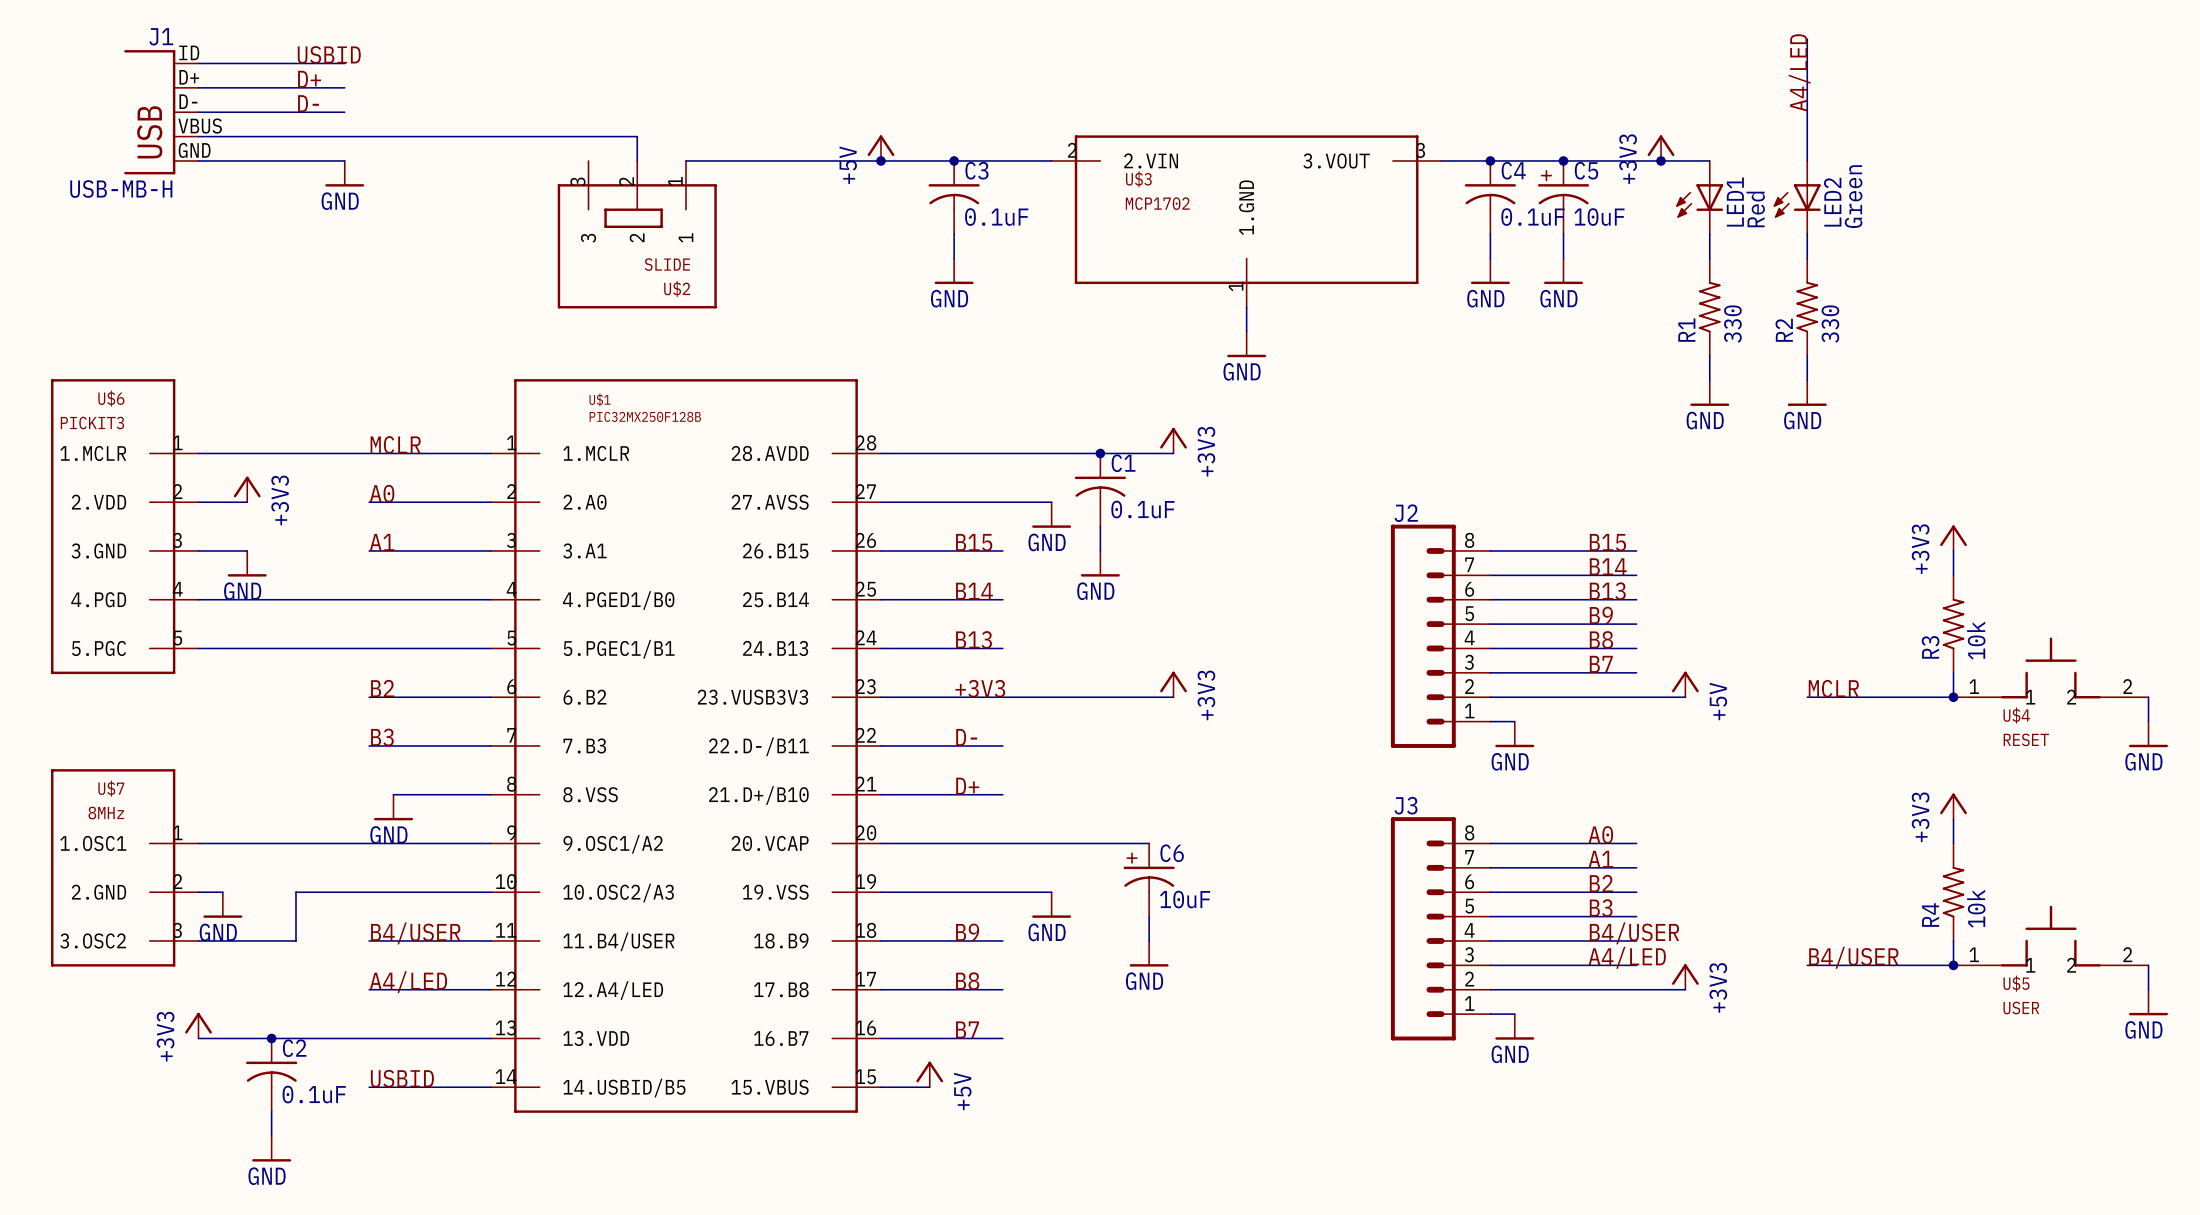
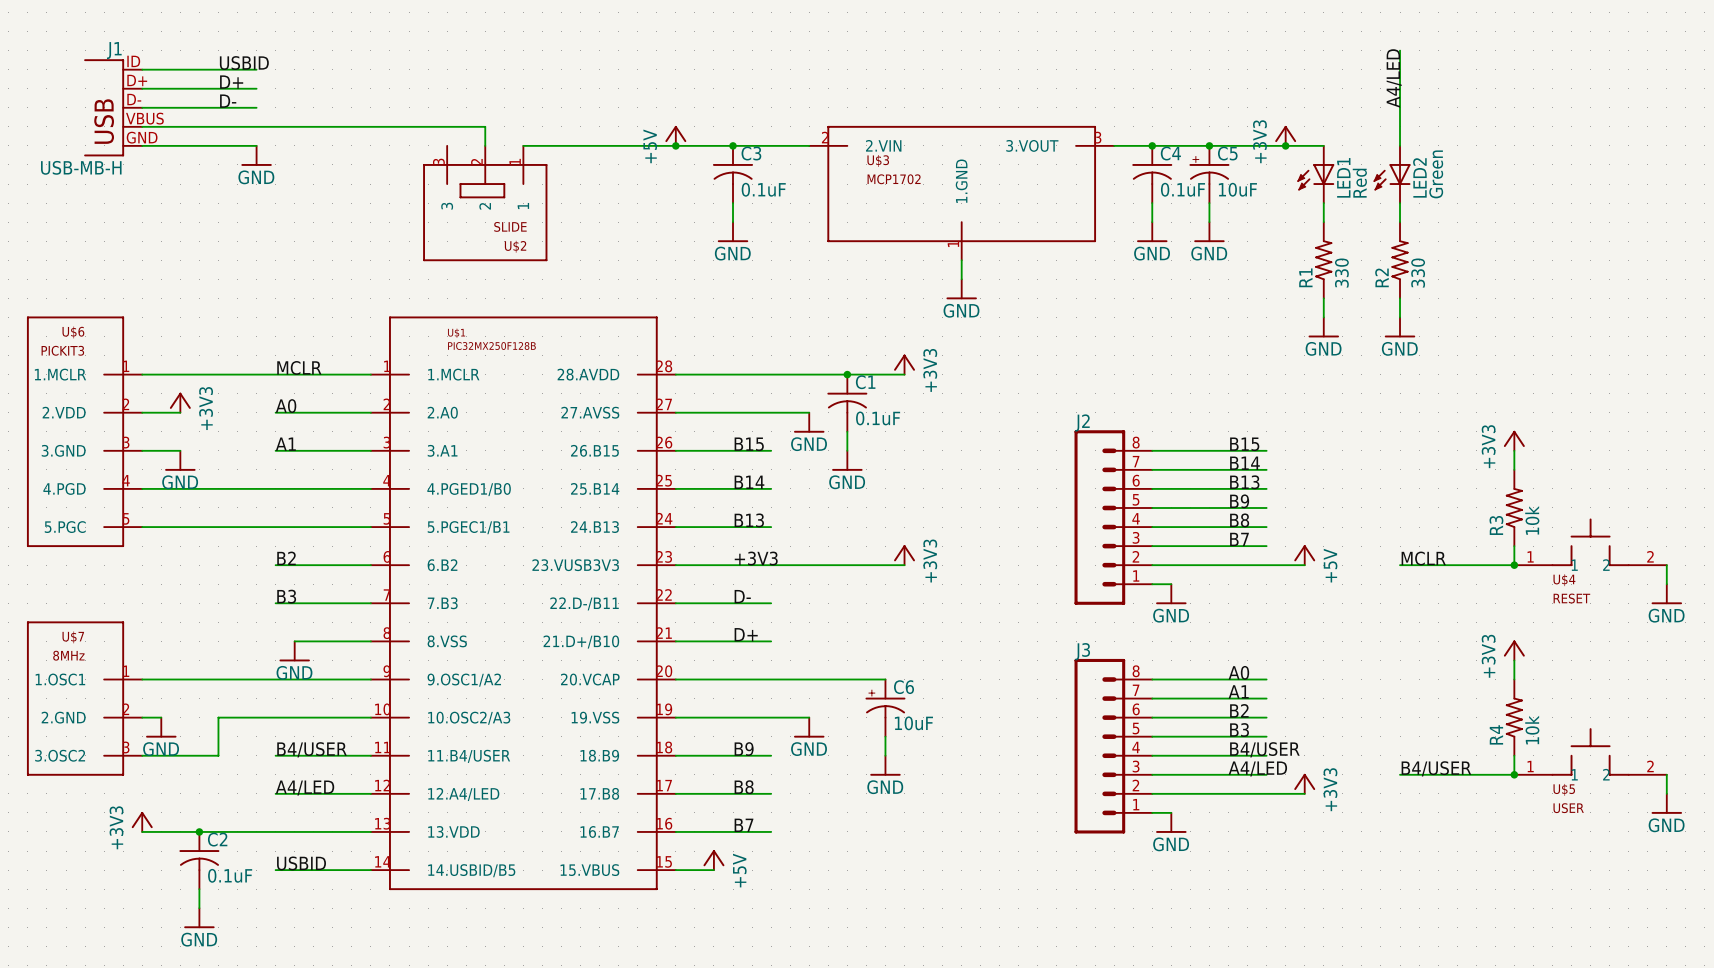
C5 symbol: [1537, 160, 1590, 235] -> [1189, 145, 1230, 204]
line: (1546, 170) (1546, 180) -> none
line: (1541, 175) (1551, 175) -> none
C6 symbol: [1123, 843, 1175, 917] -> [865, 679, 906, 737]
line: (1132, 853) (1132, 862) -> none
line: (1127, 858) (1136, 858) -> none

